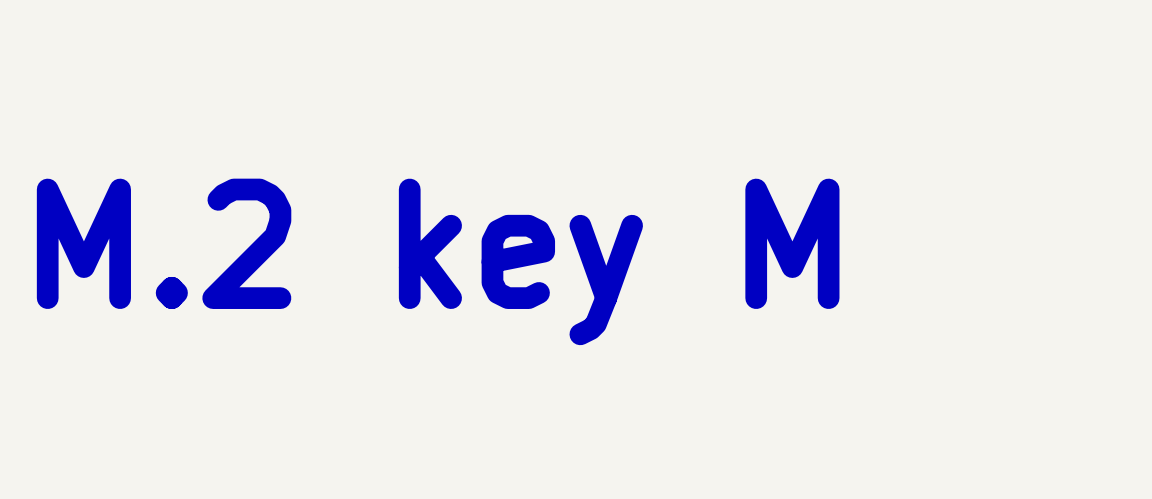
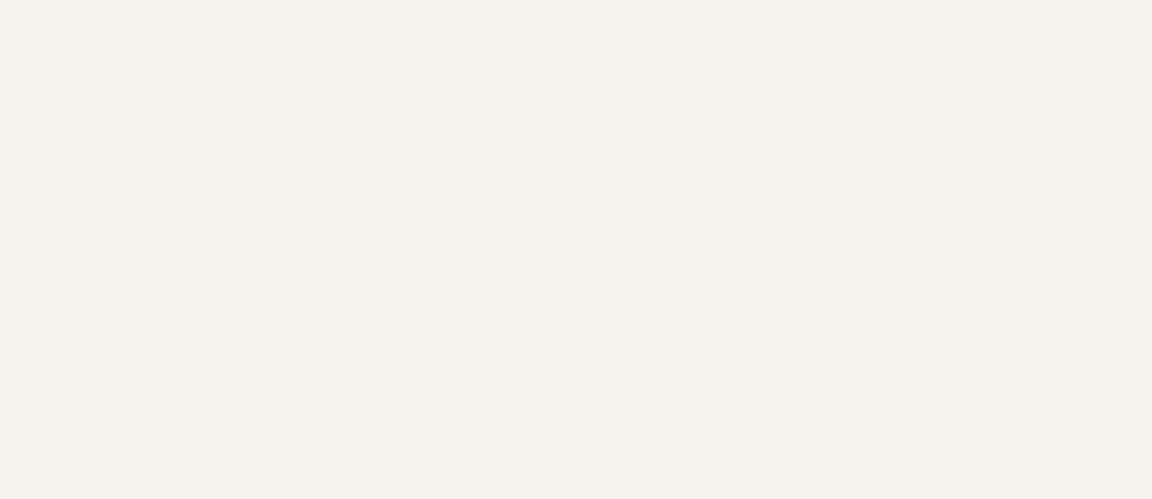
text: M.2 key M (438, 261) -> none

